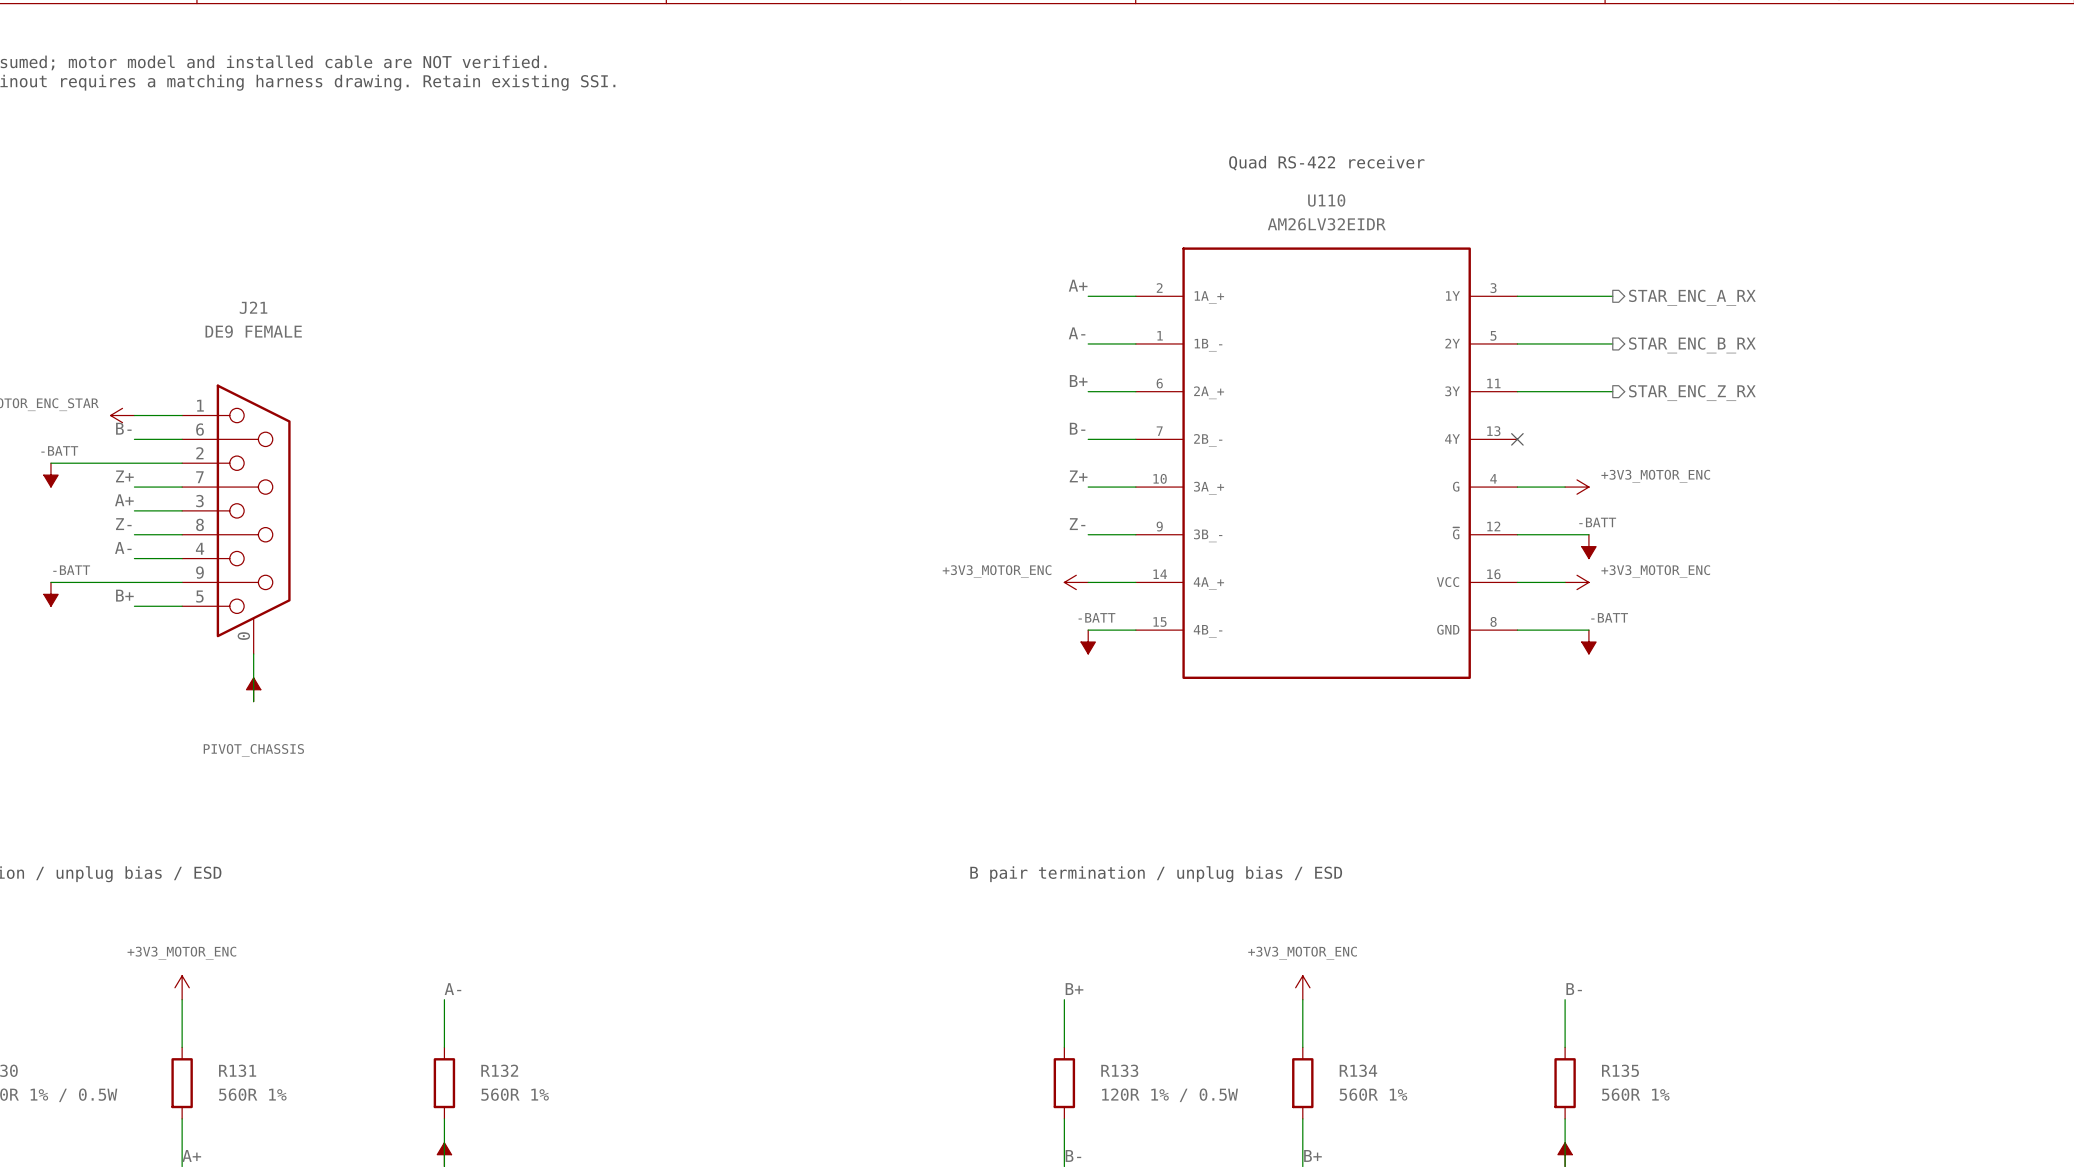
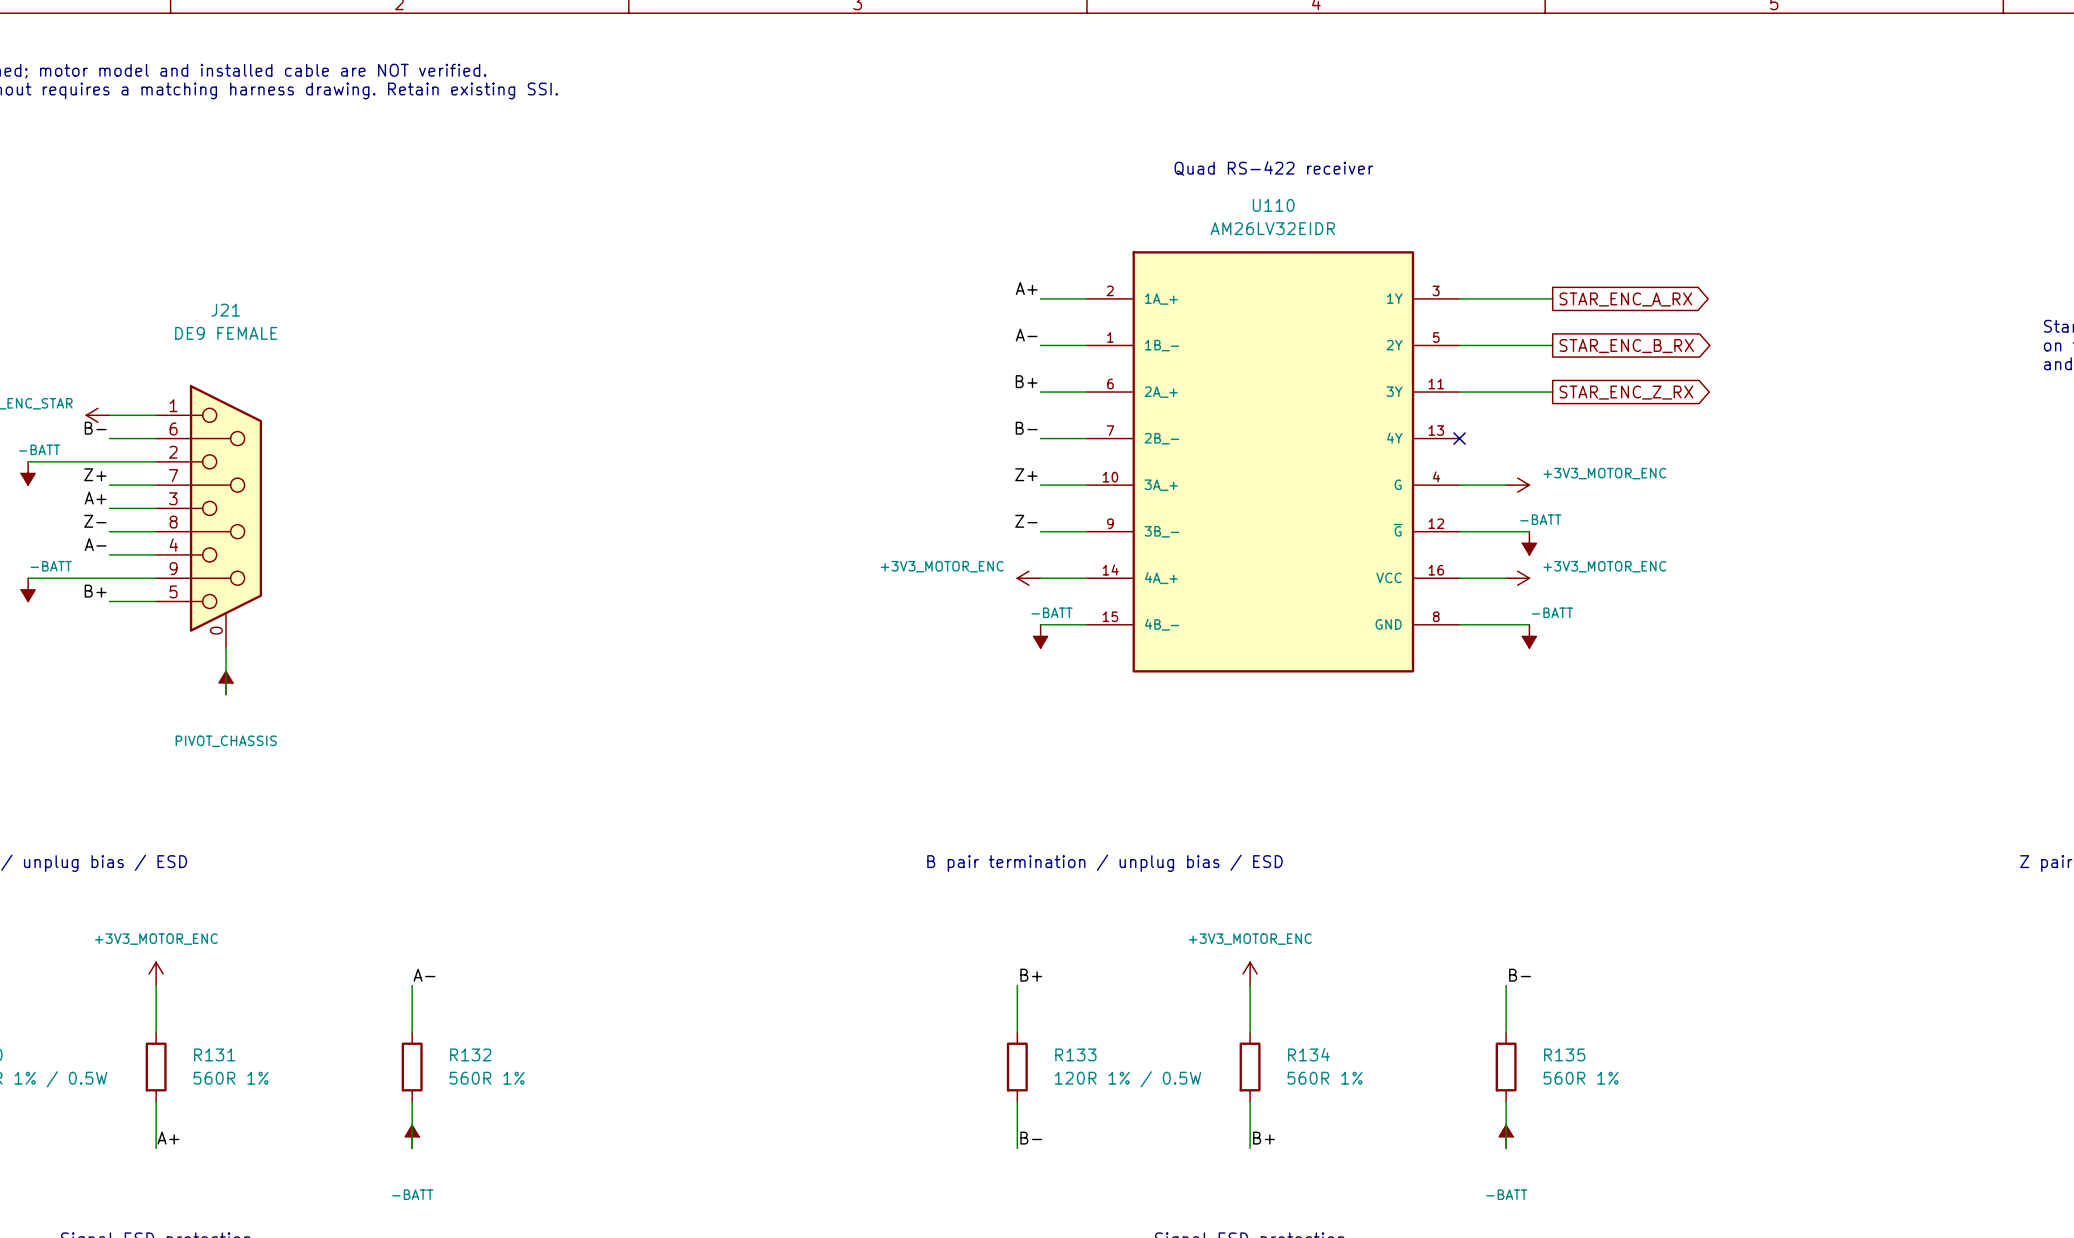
hierarchical label: STAR_ENC_A_RX (1692, 297) -> none
global label: none -> STAR_ENC_A_RX (1625, 299)
global label: none -> STAR_ENC_B_RX (1626, 346)
hierarchical label: STAR_ENC_B_RX (1692, 345) -> none
global label: none -> STAR_ENC_Z_RX (1626, 392)
hierarchical label: STAR_ENC_Z_RX (1692, 393) -> none

